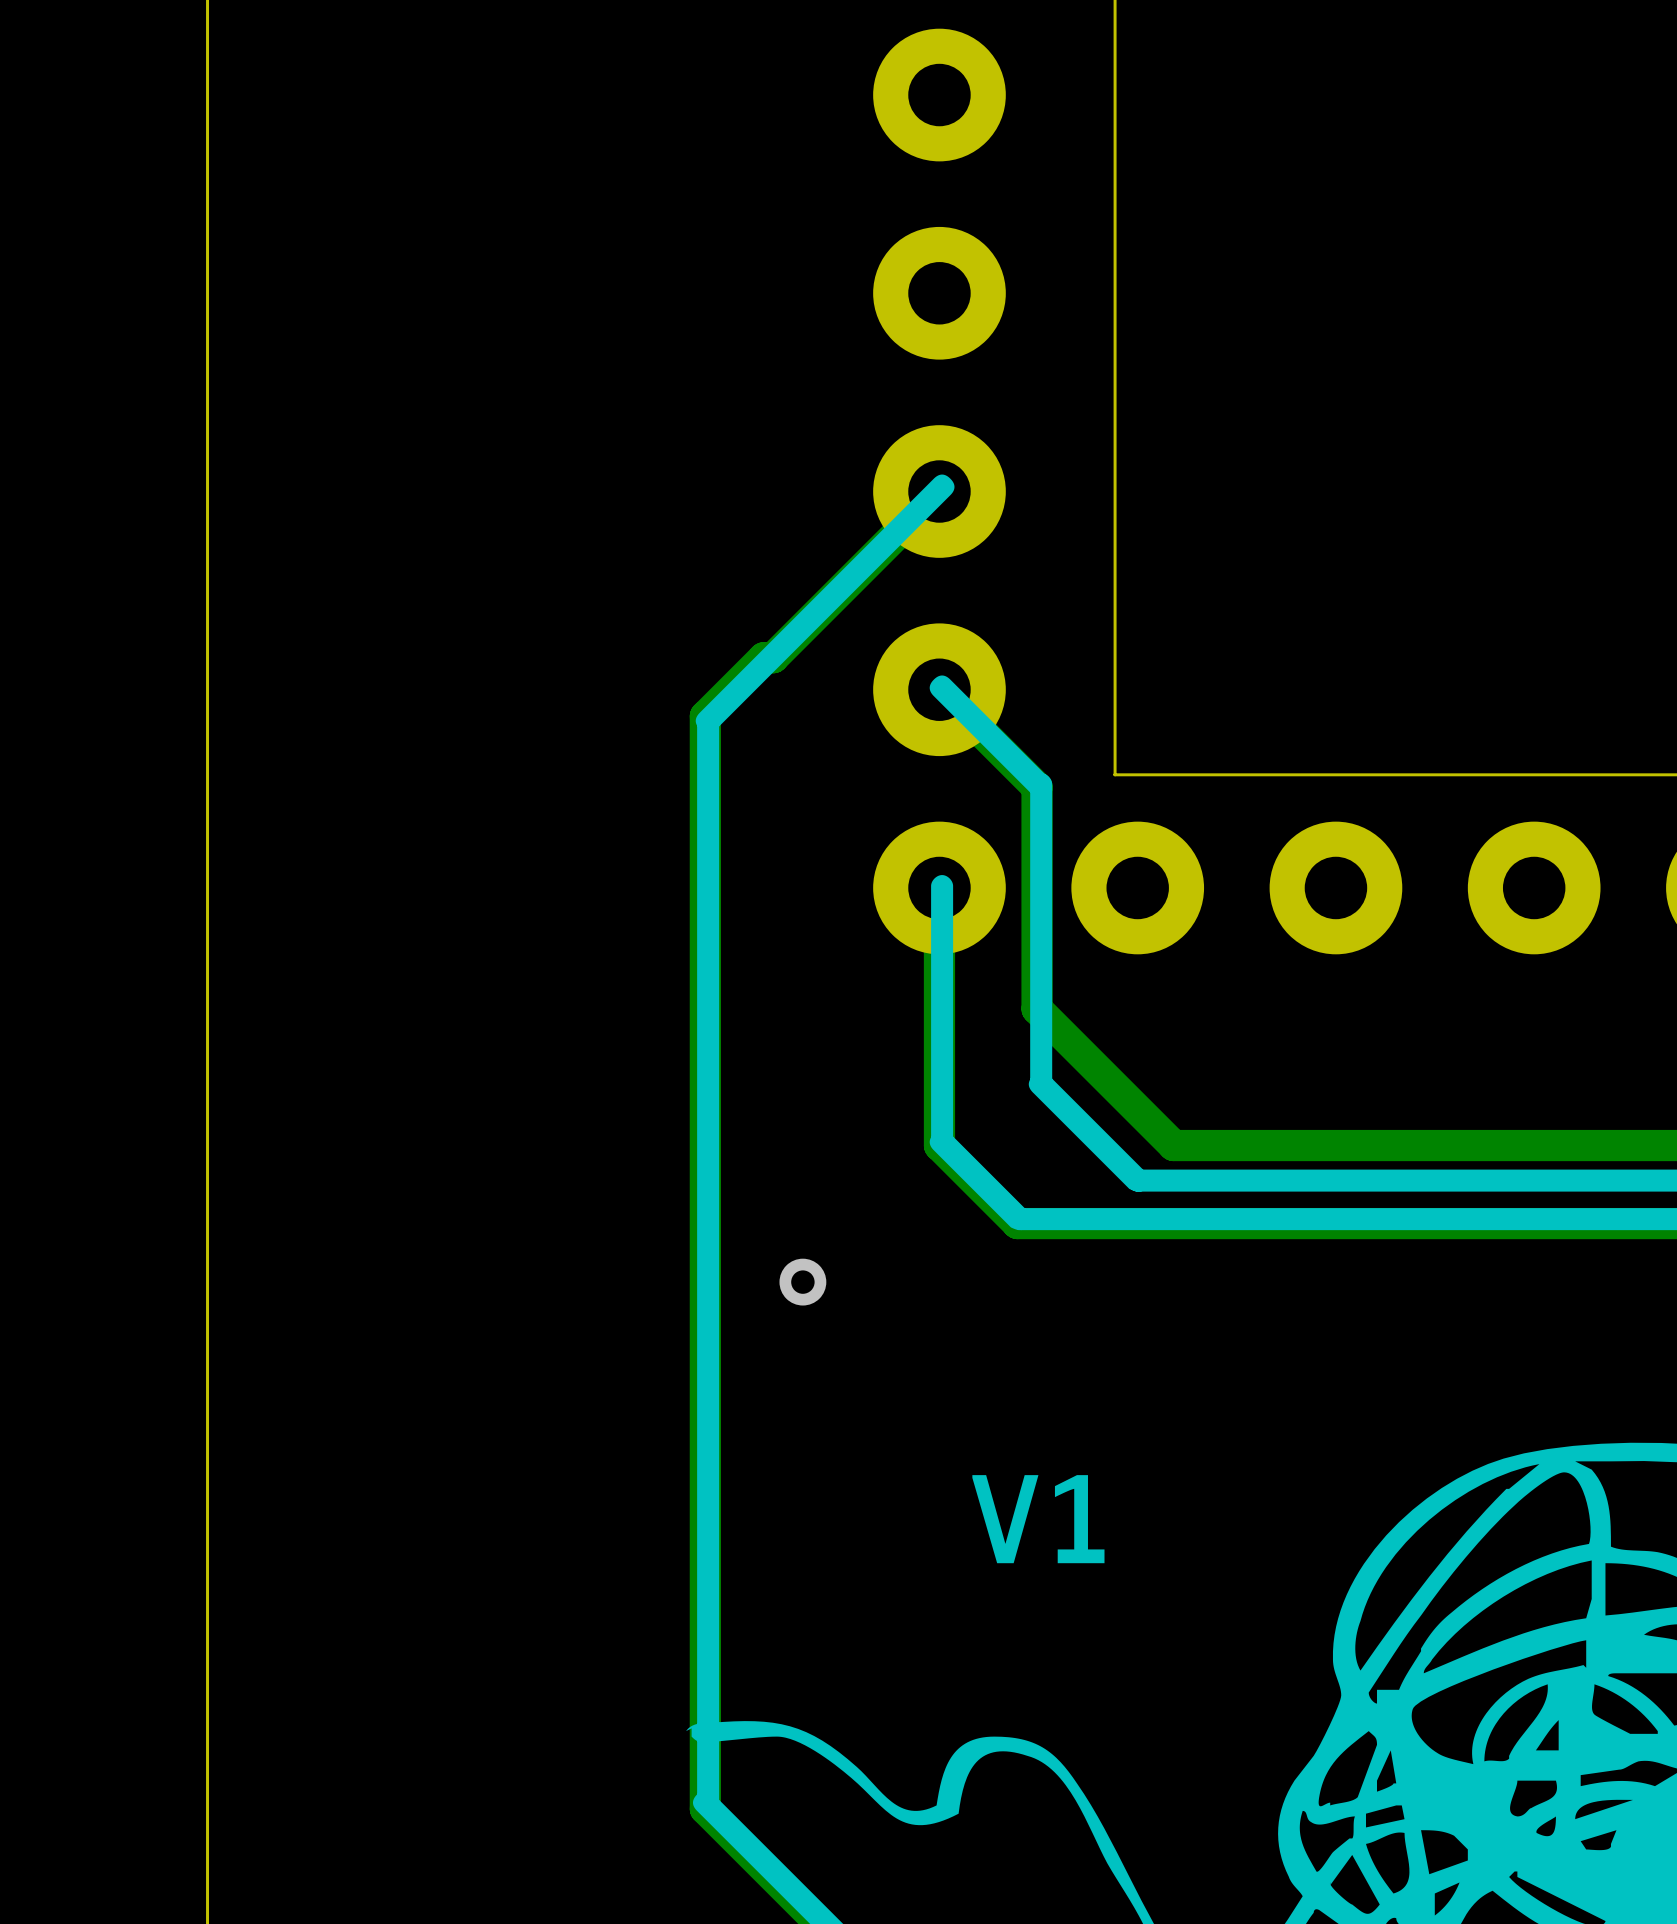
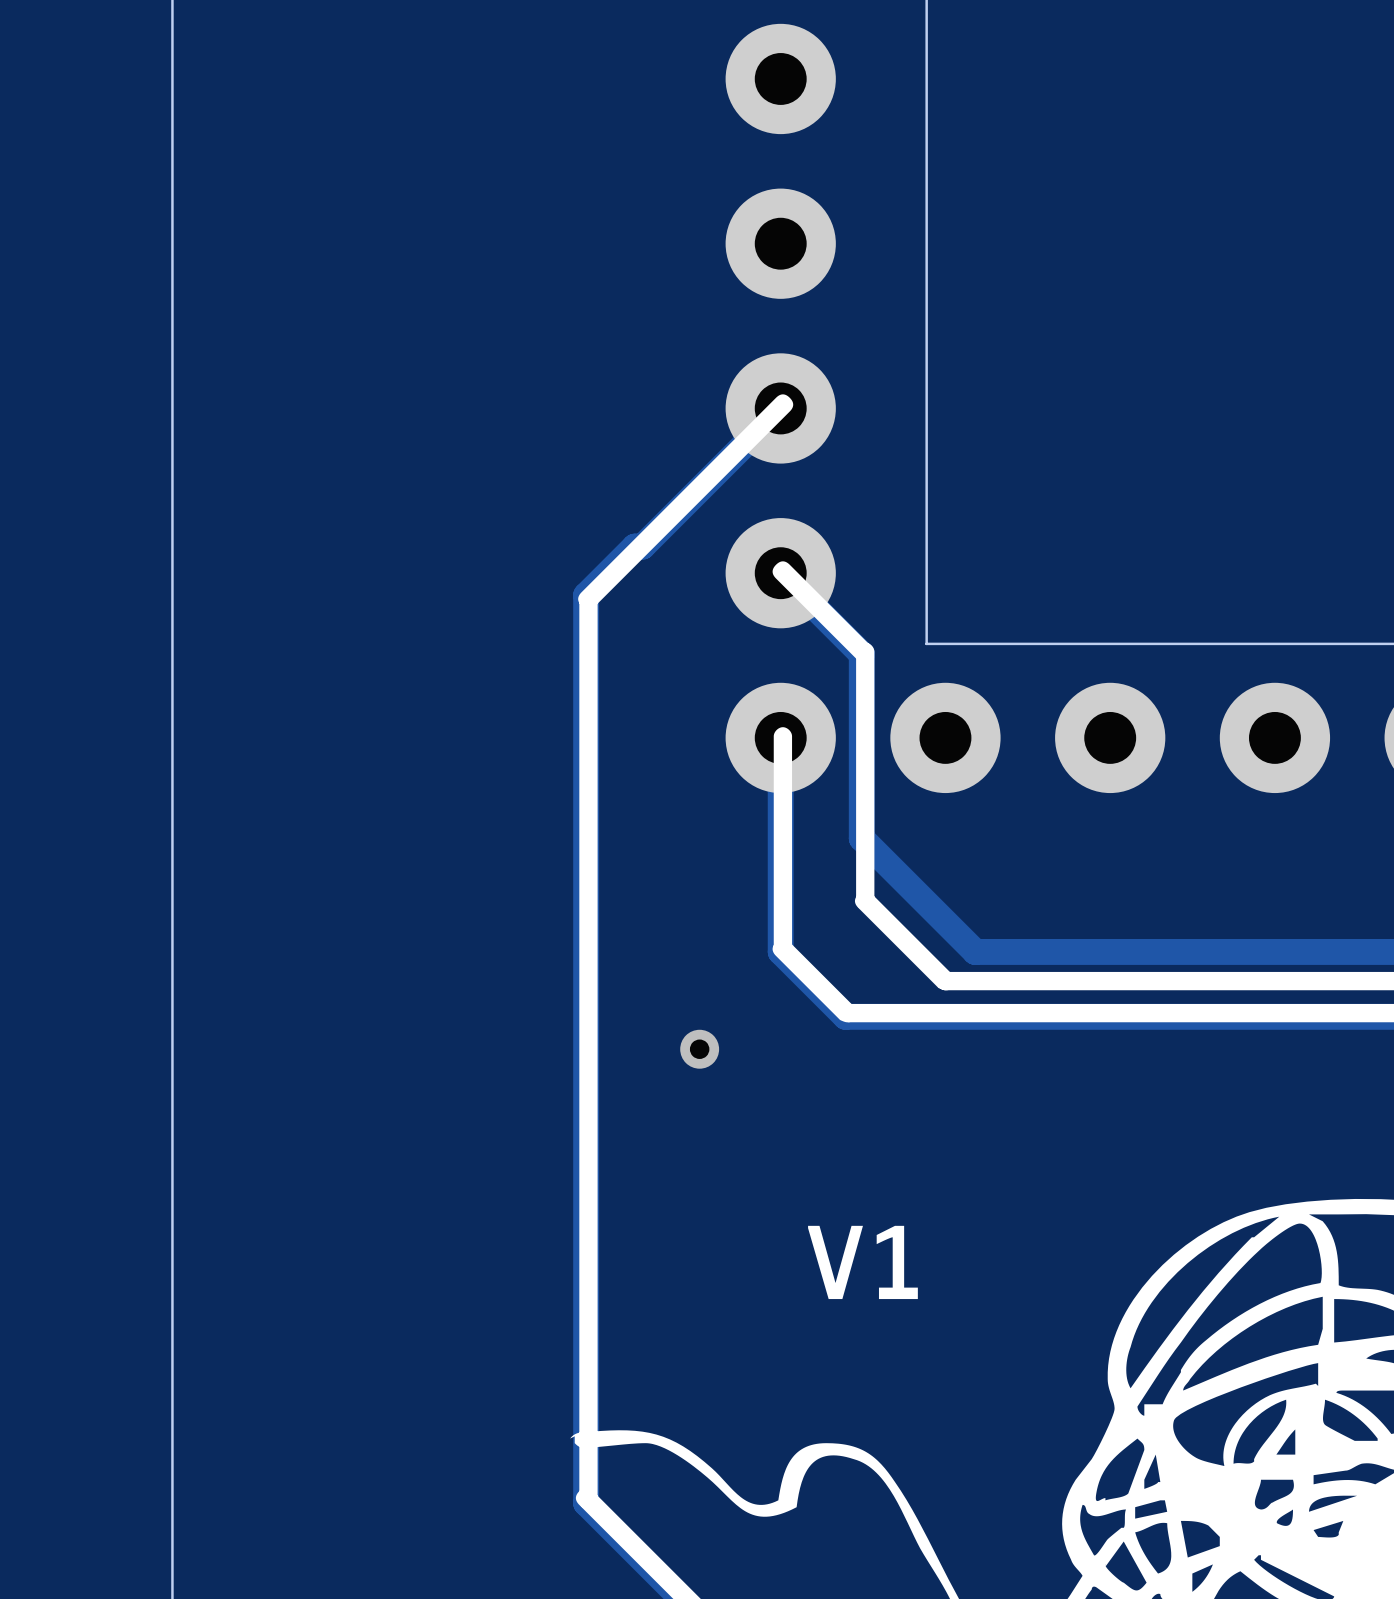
via position: (802, 1282) -> (699, 1049)

